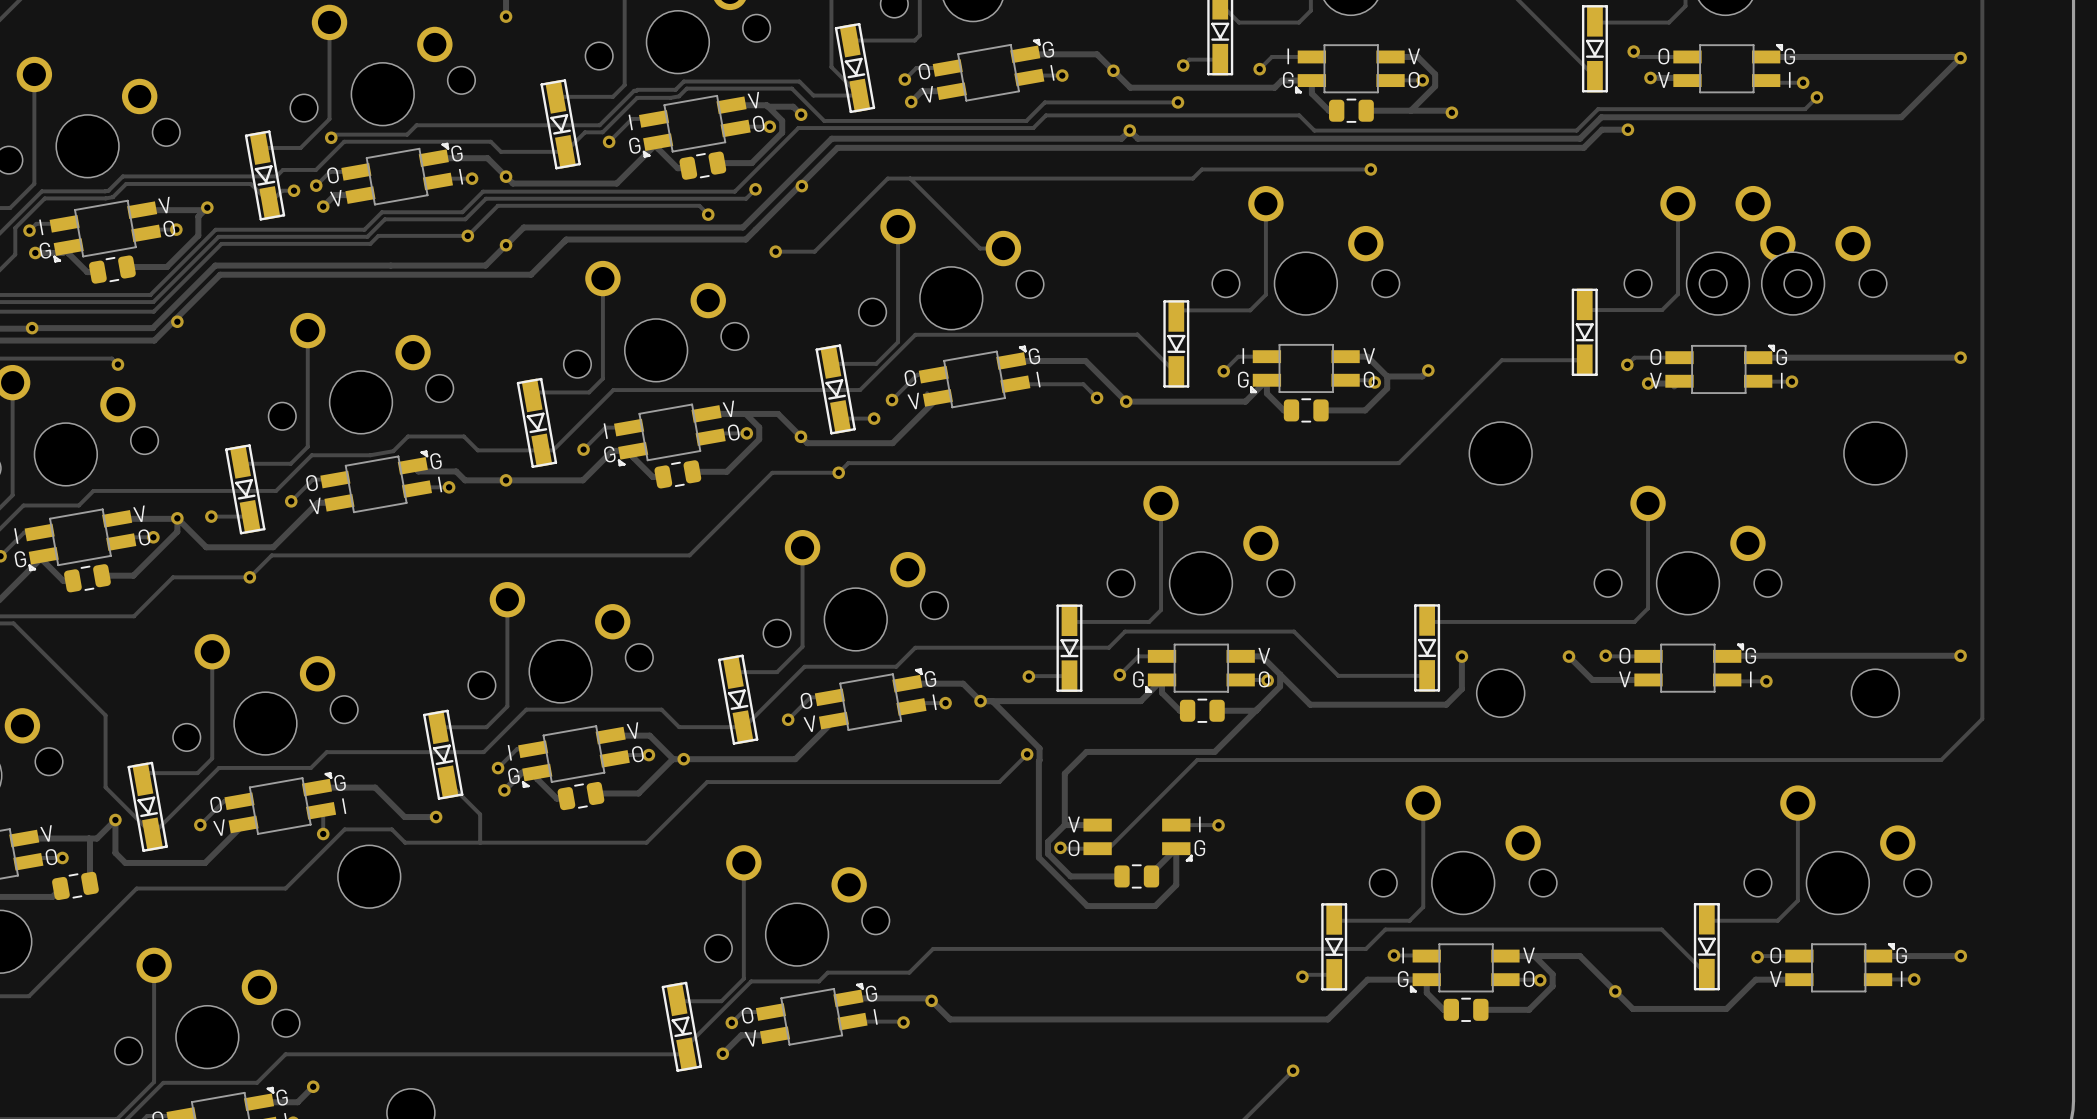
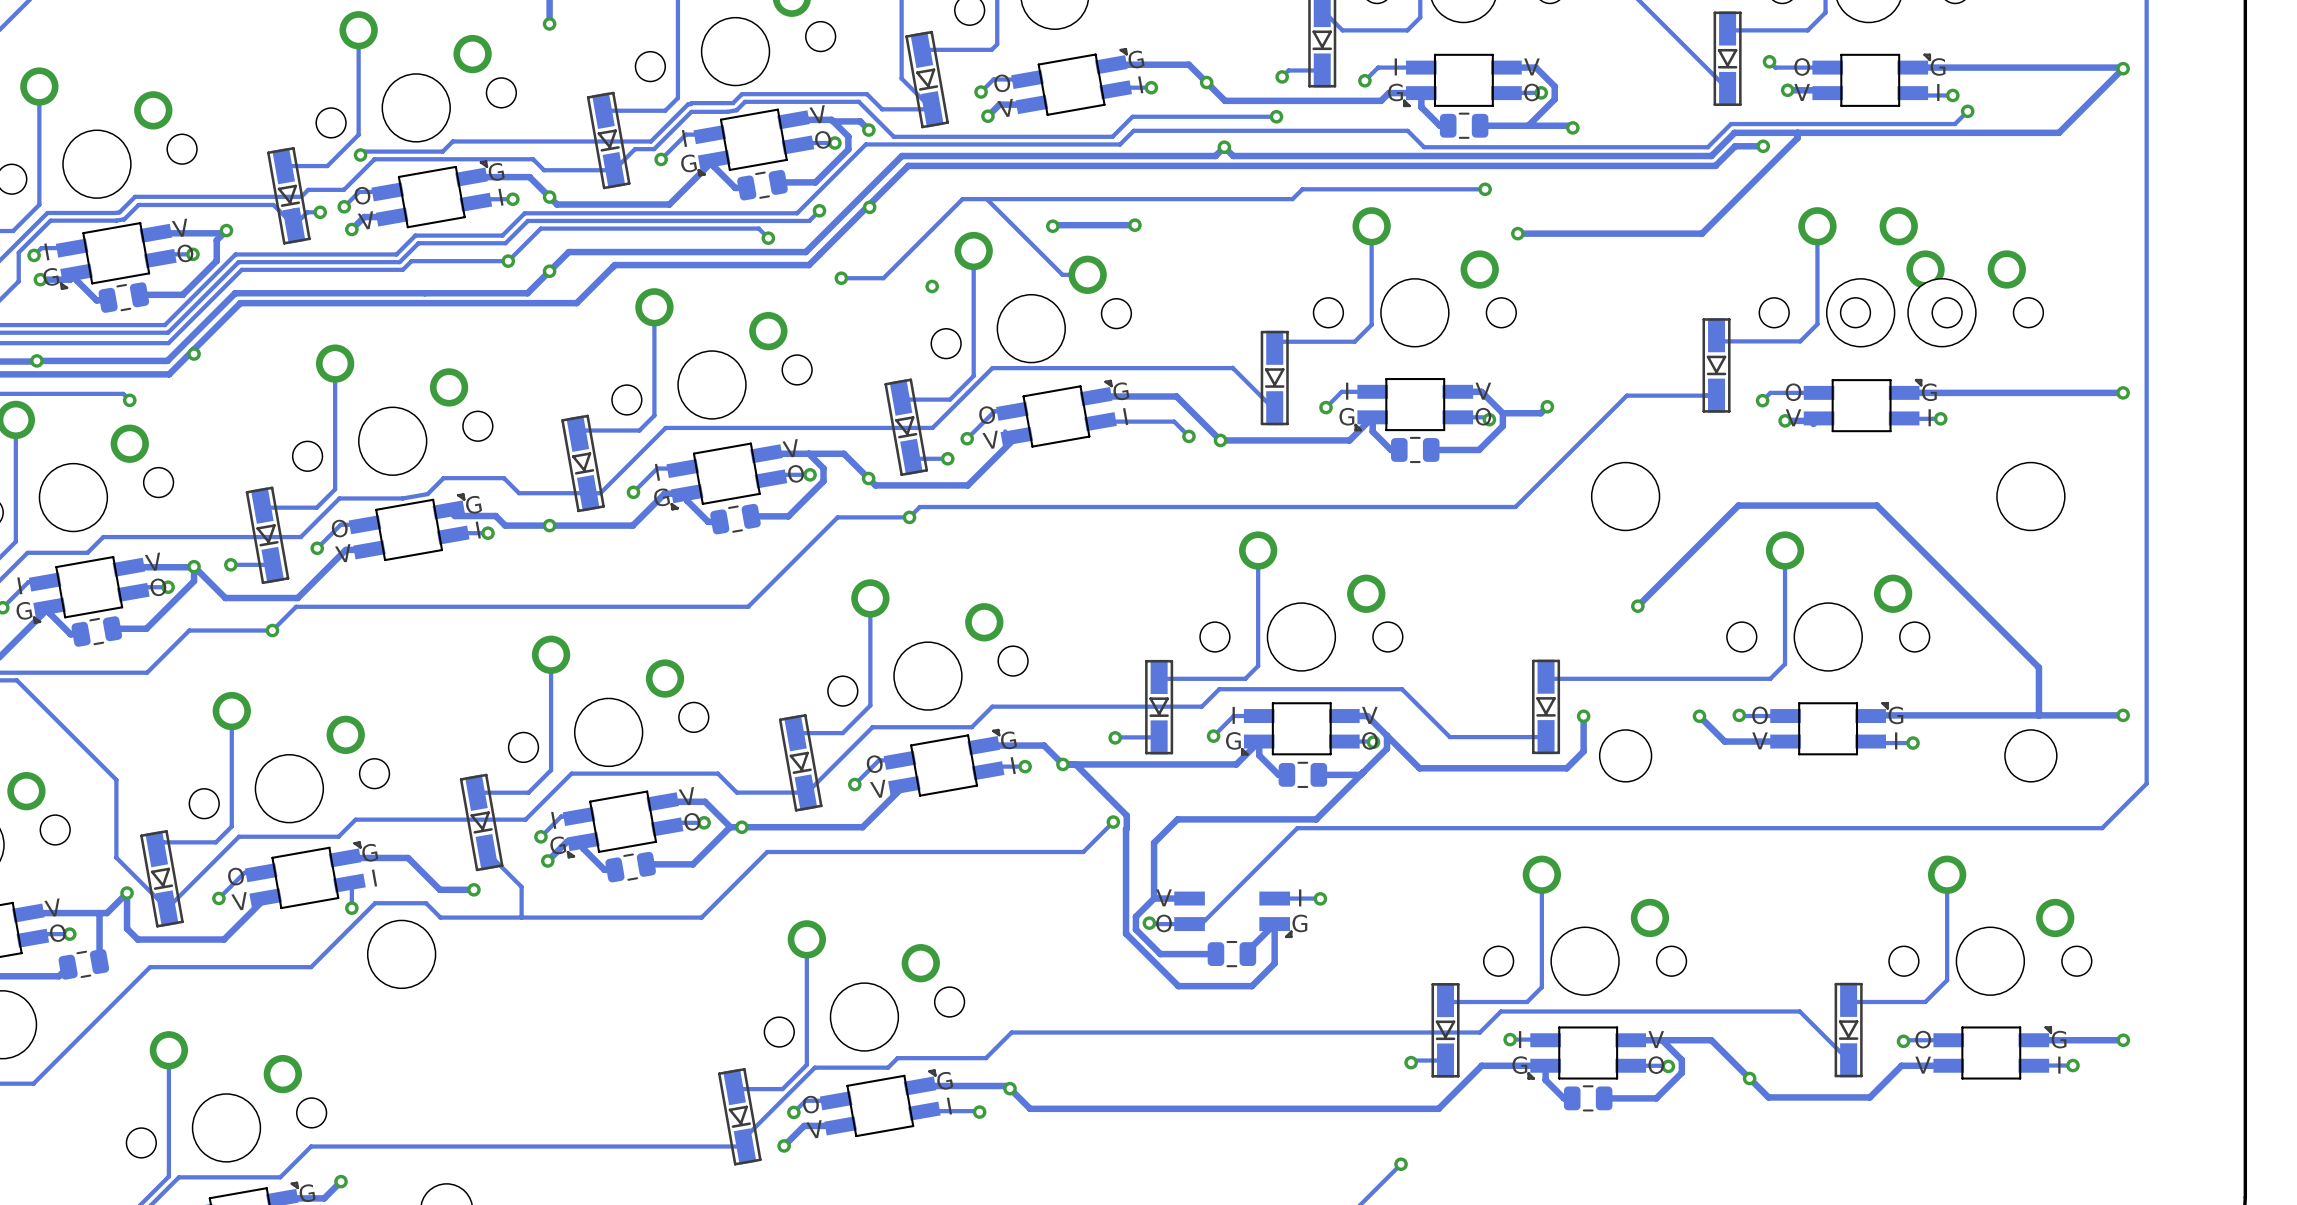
track: none -> (1797, 132) (1797, 138) (1702, 233) (1517, 233)
track: none -> (1134, 225) (1052, 226)
via: none -> (1134, 225)
via: none -> (1052, 226)
via: none -> (1517, 233)
via: none -> (932, 286)
track: none -> (1637, 606) (1738, 505) (1876, 505) (2038, 667) (2038, 715)
via: none -> (1637, 606)

